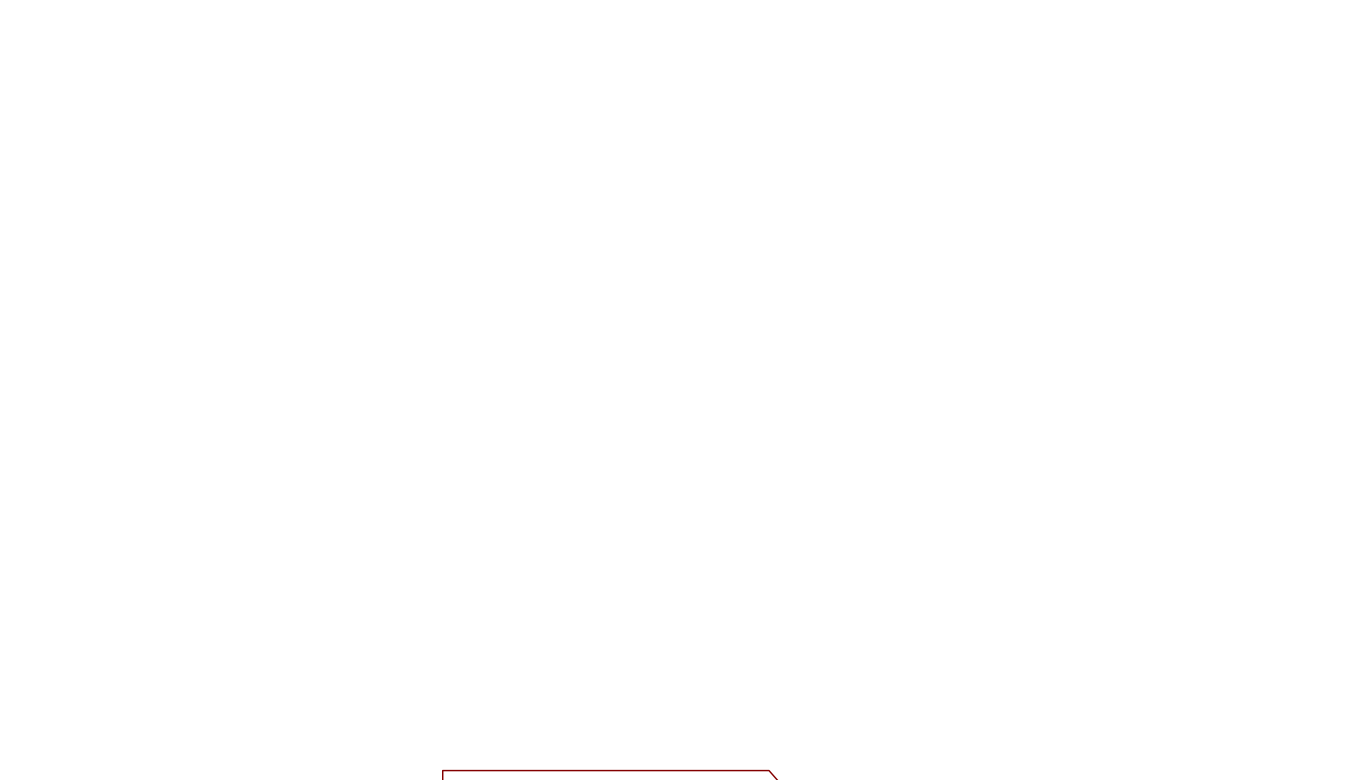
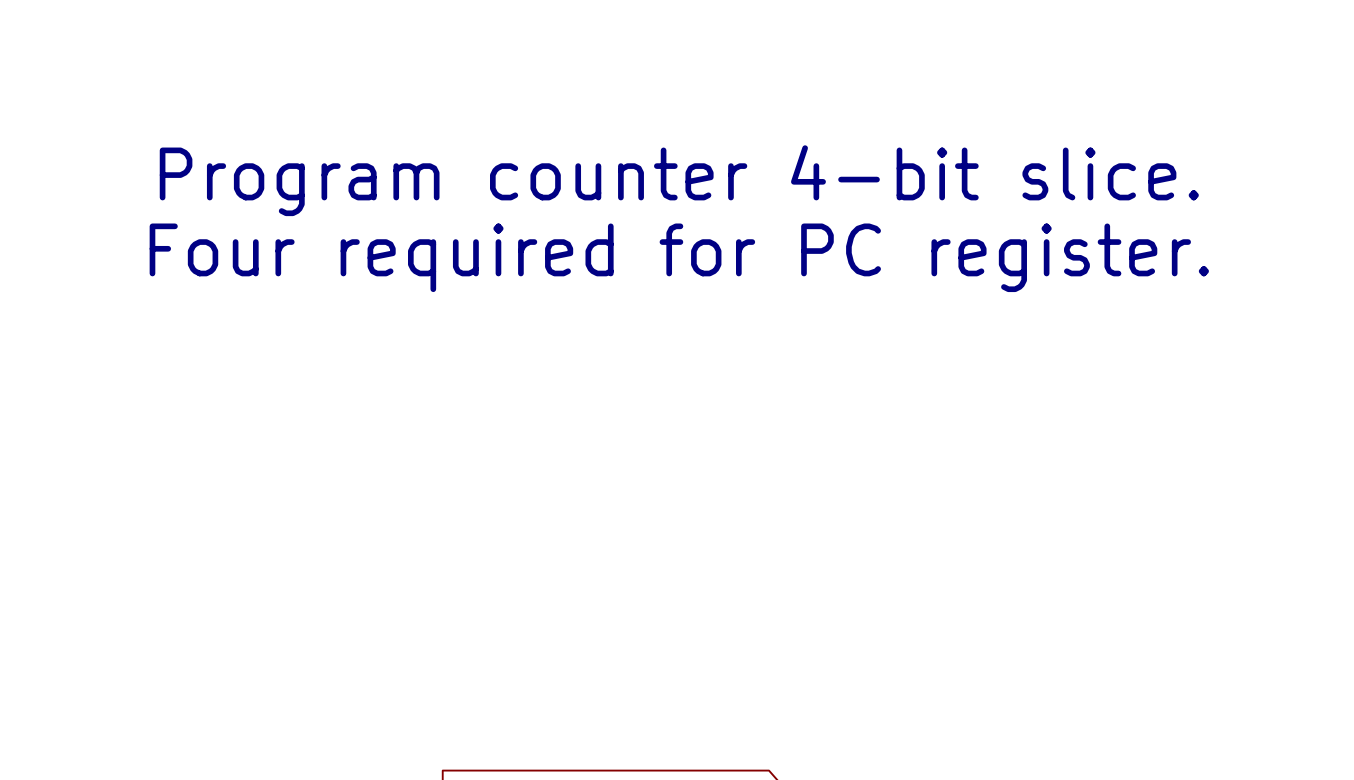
text: none -> Program counter 4-bit slice. (679, 180)
text: none -> Four required for PC register. (679, 257)

